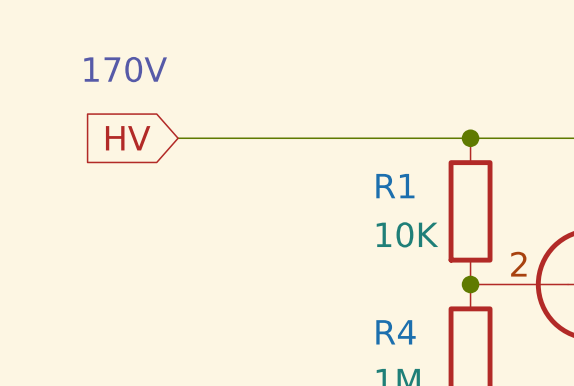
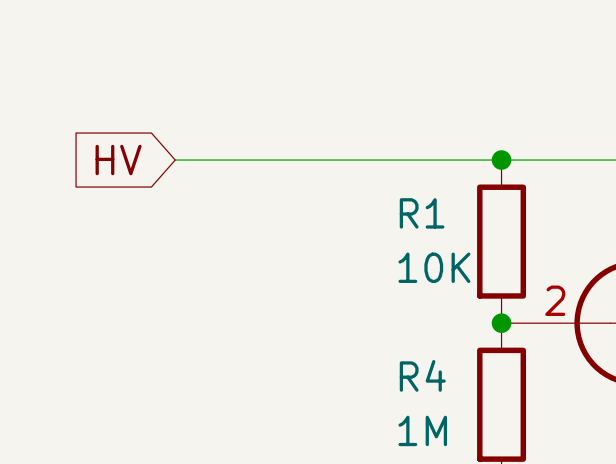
text: 170V (125, 69) -> none

